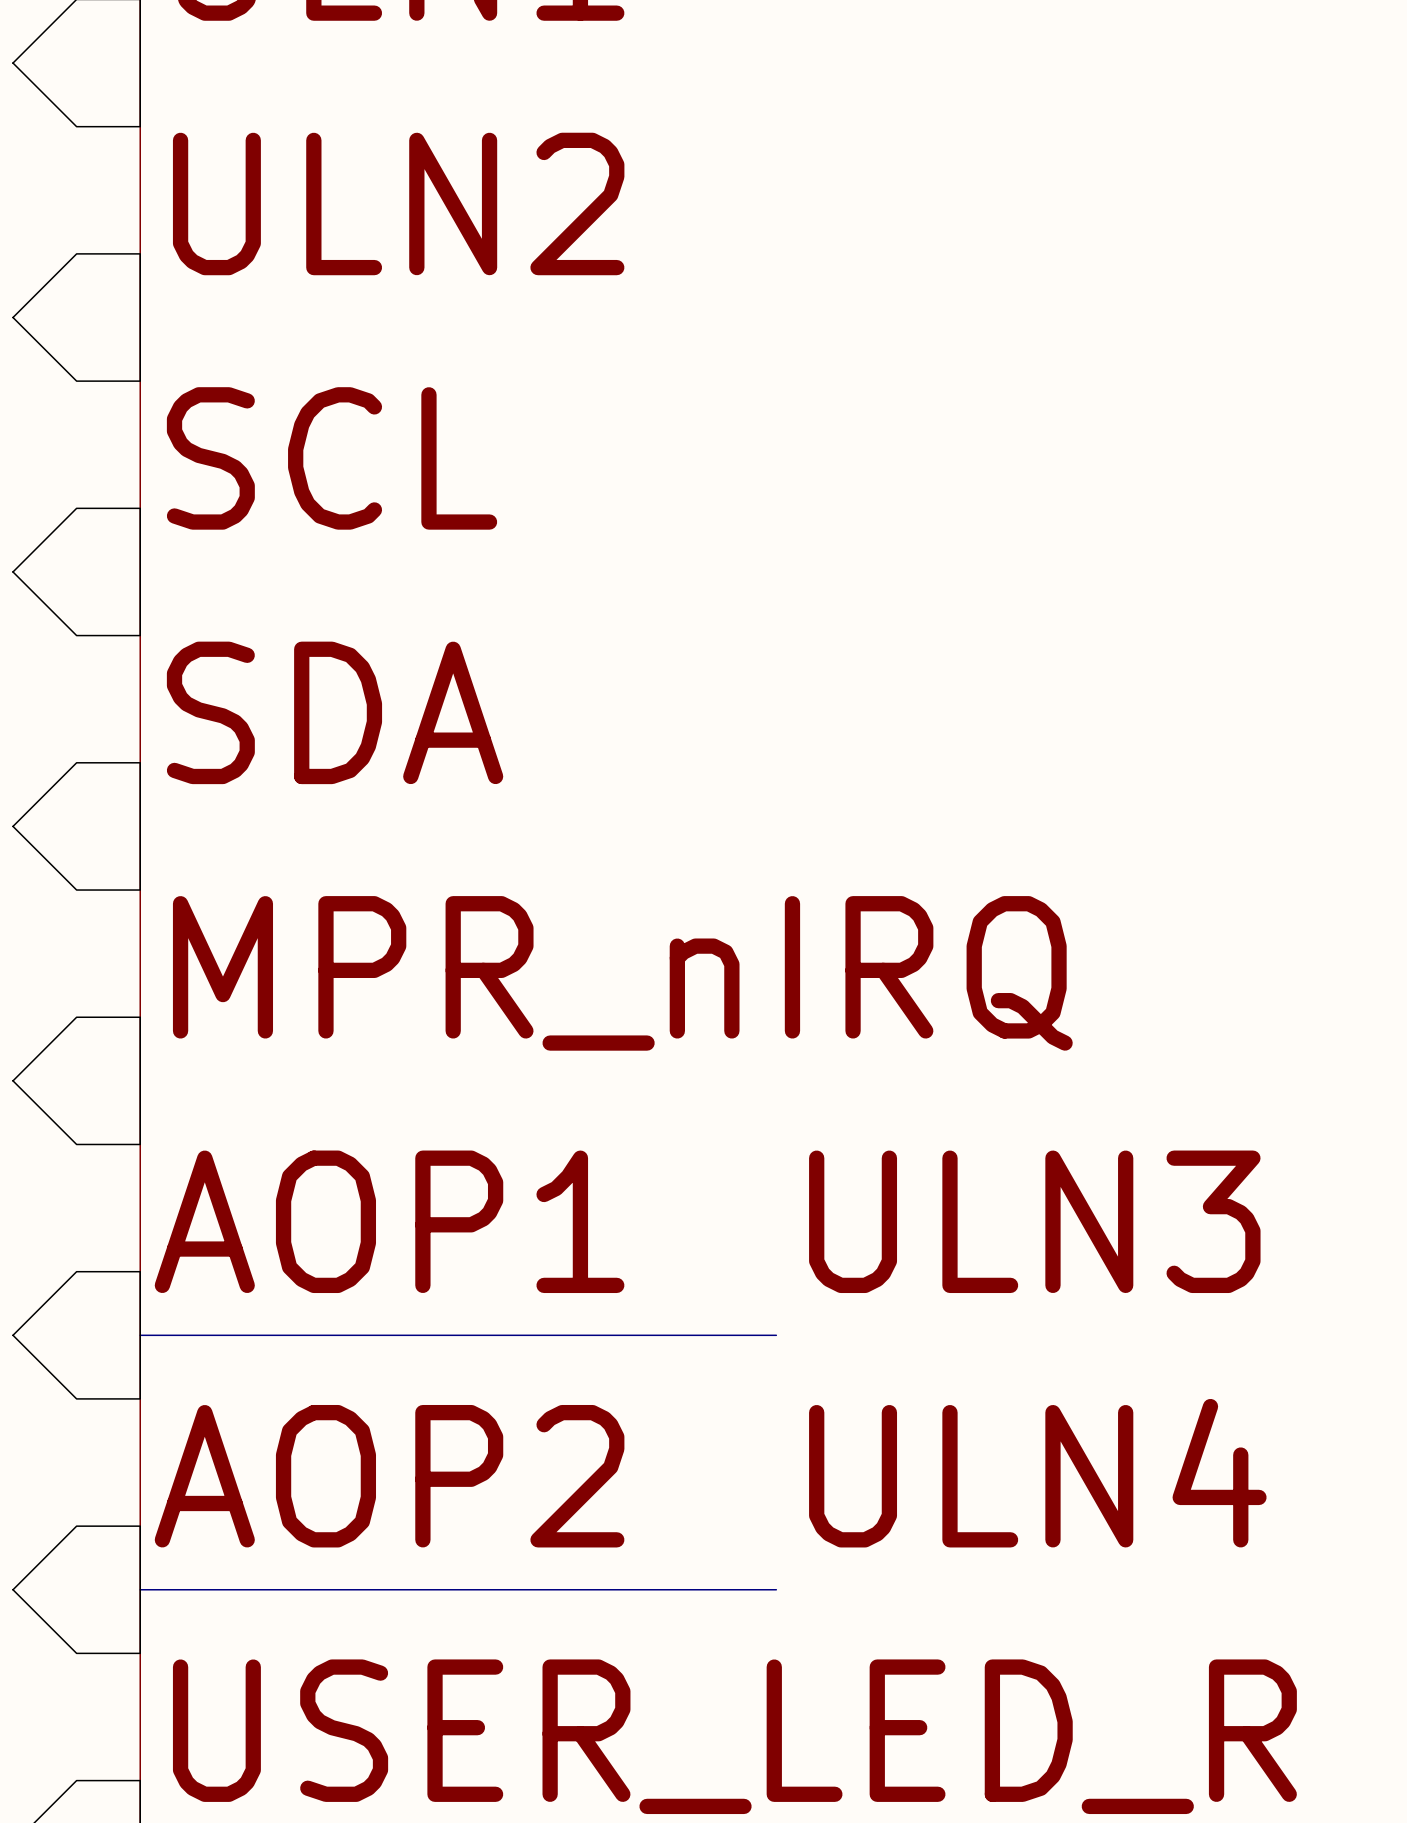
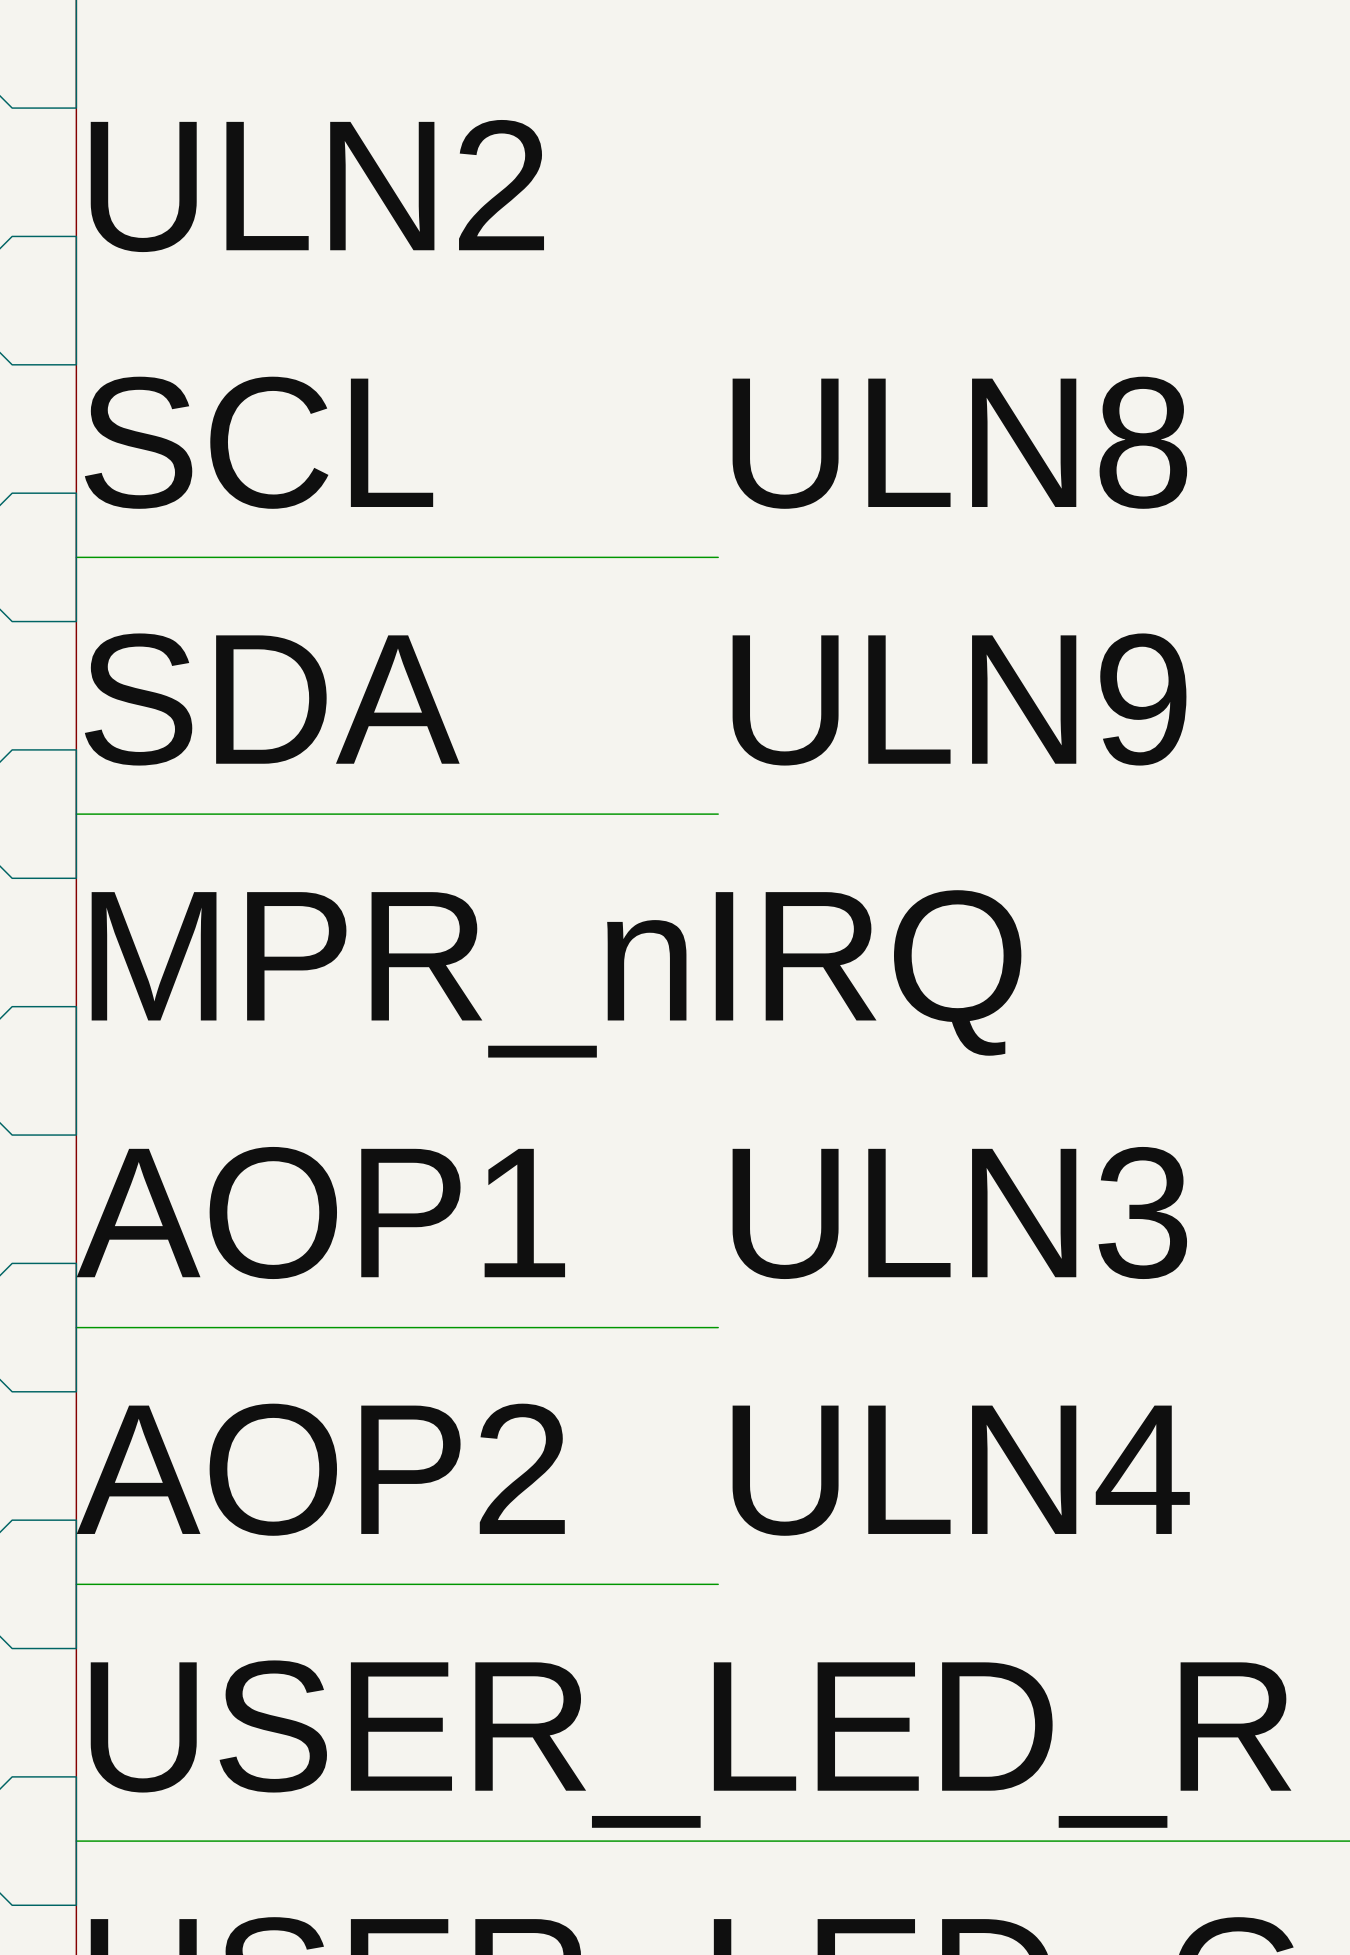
label: none -> ULN8 (959, 442)
wire: none -> (76, 557) (718, 557)
label: none -> ULN9 (959, 699)
wire: none -> (76, 814) (718, 814)

